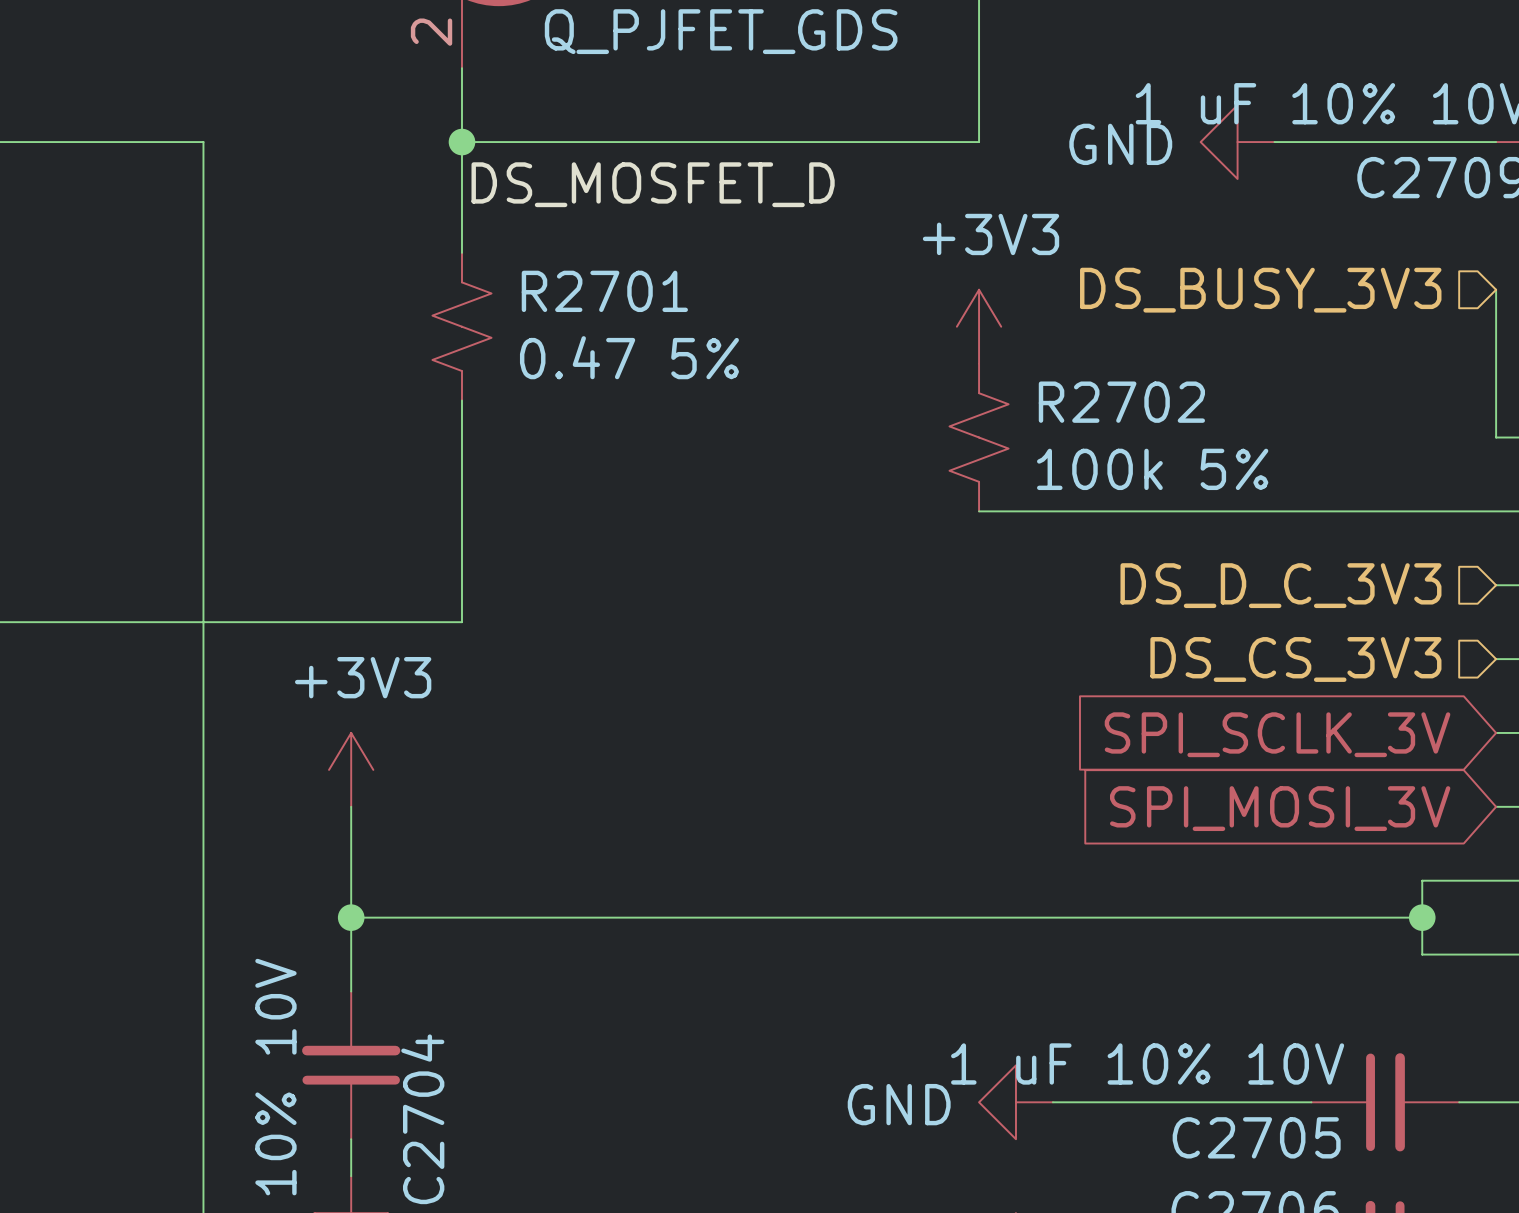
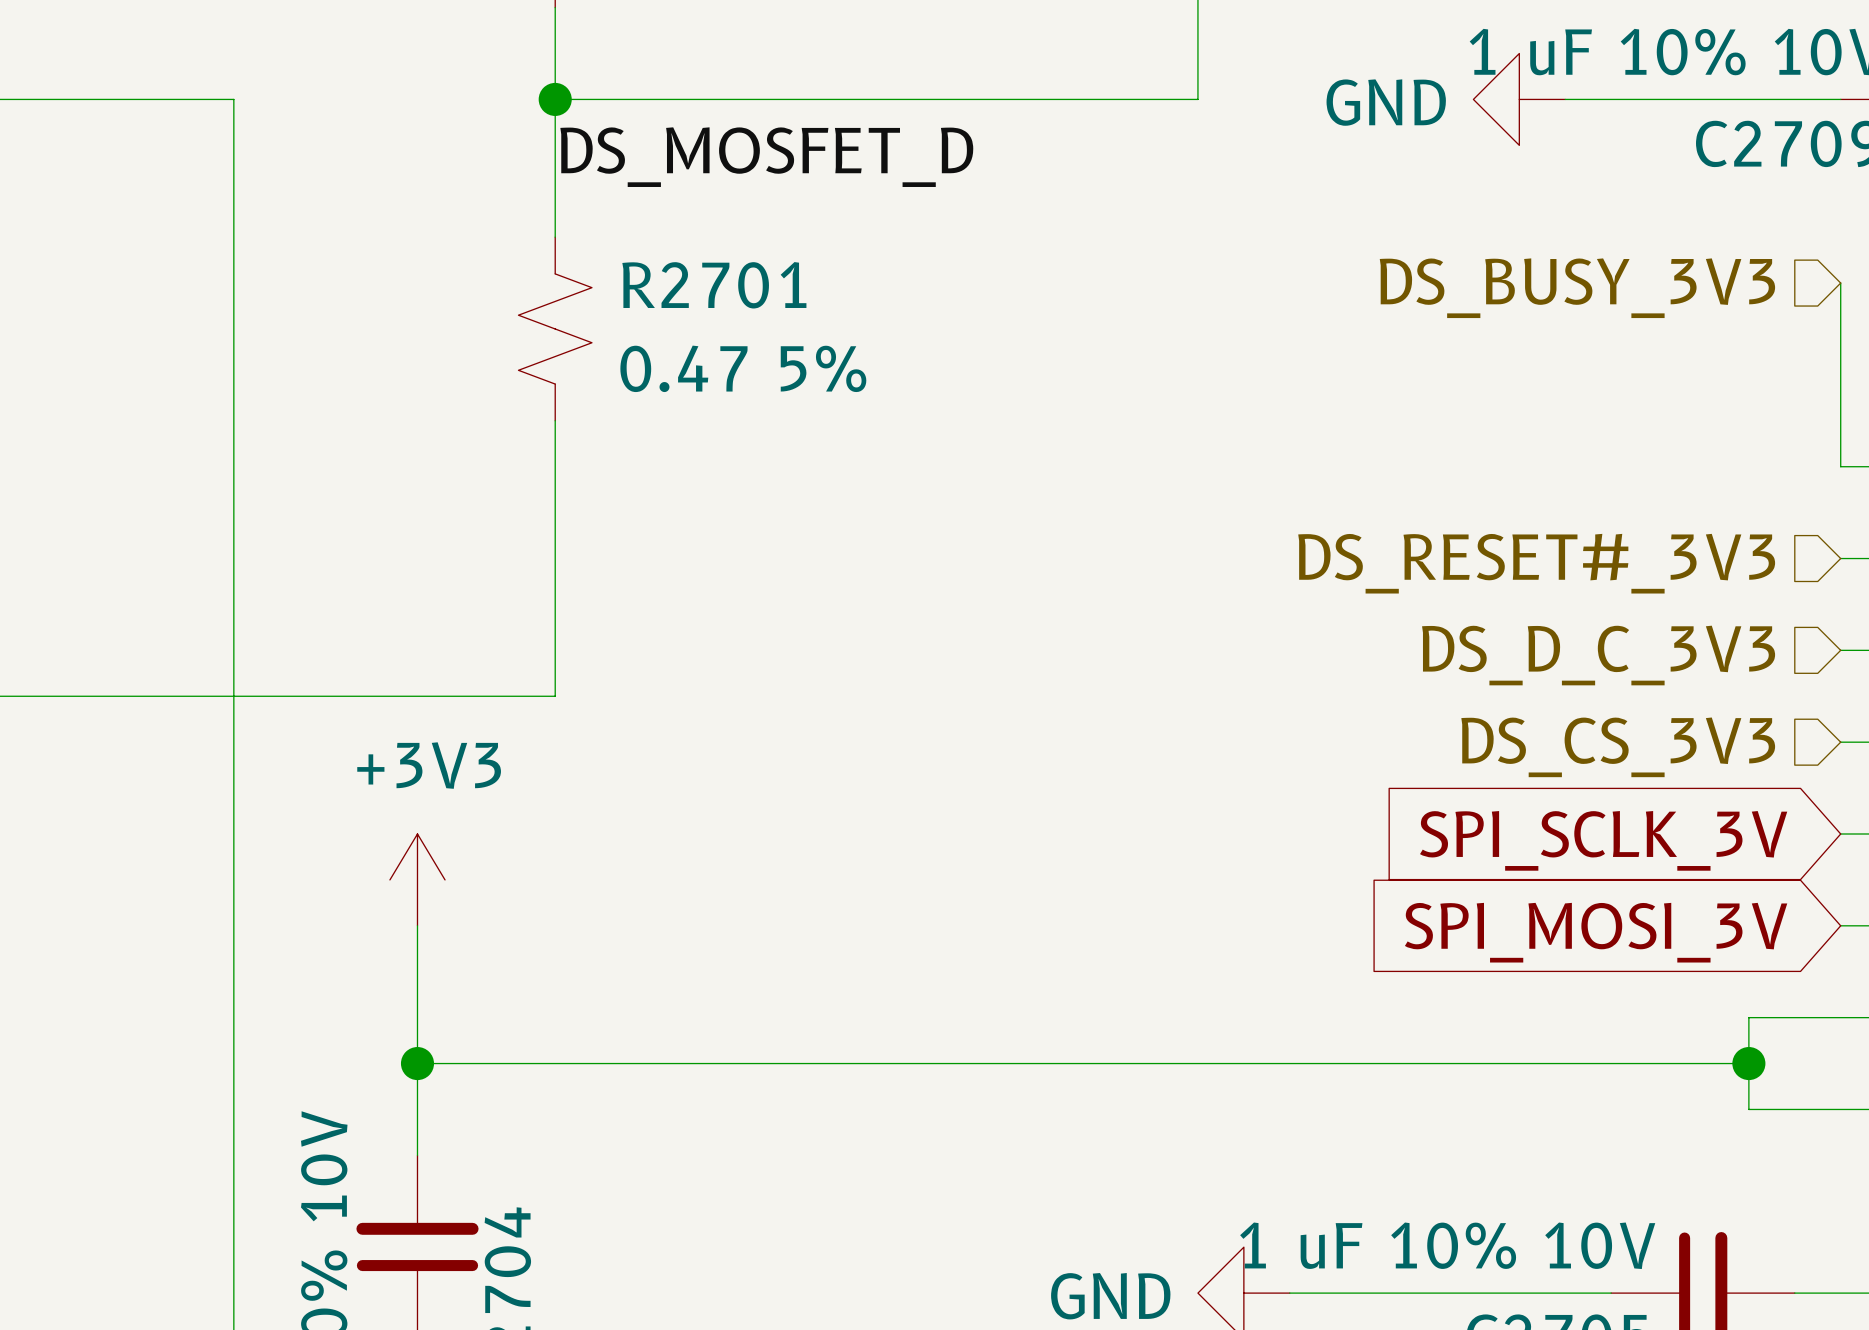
power symbol: +3V3 (979, 326) -> none
R2702: 100k 5% (979, 437) -> none
wire: (979, 511) (1496, 511) -> none
hierarchical label: none -> DS_RESET#_3V3 (1536, 563)

